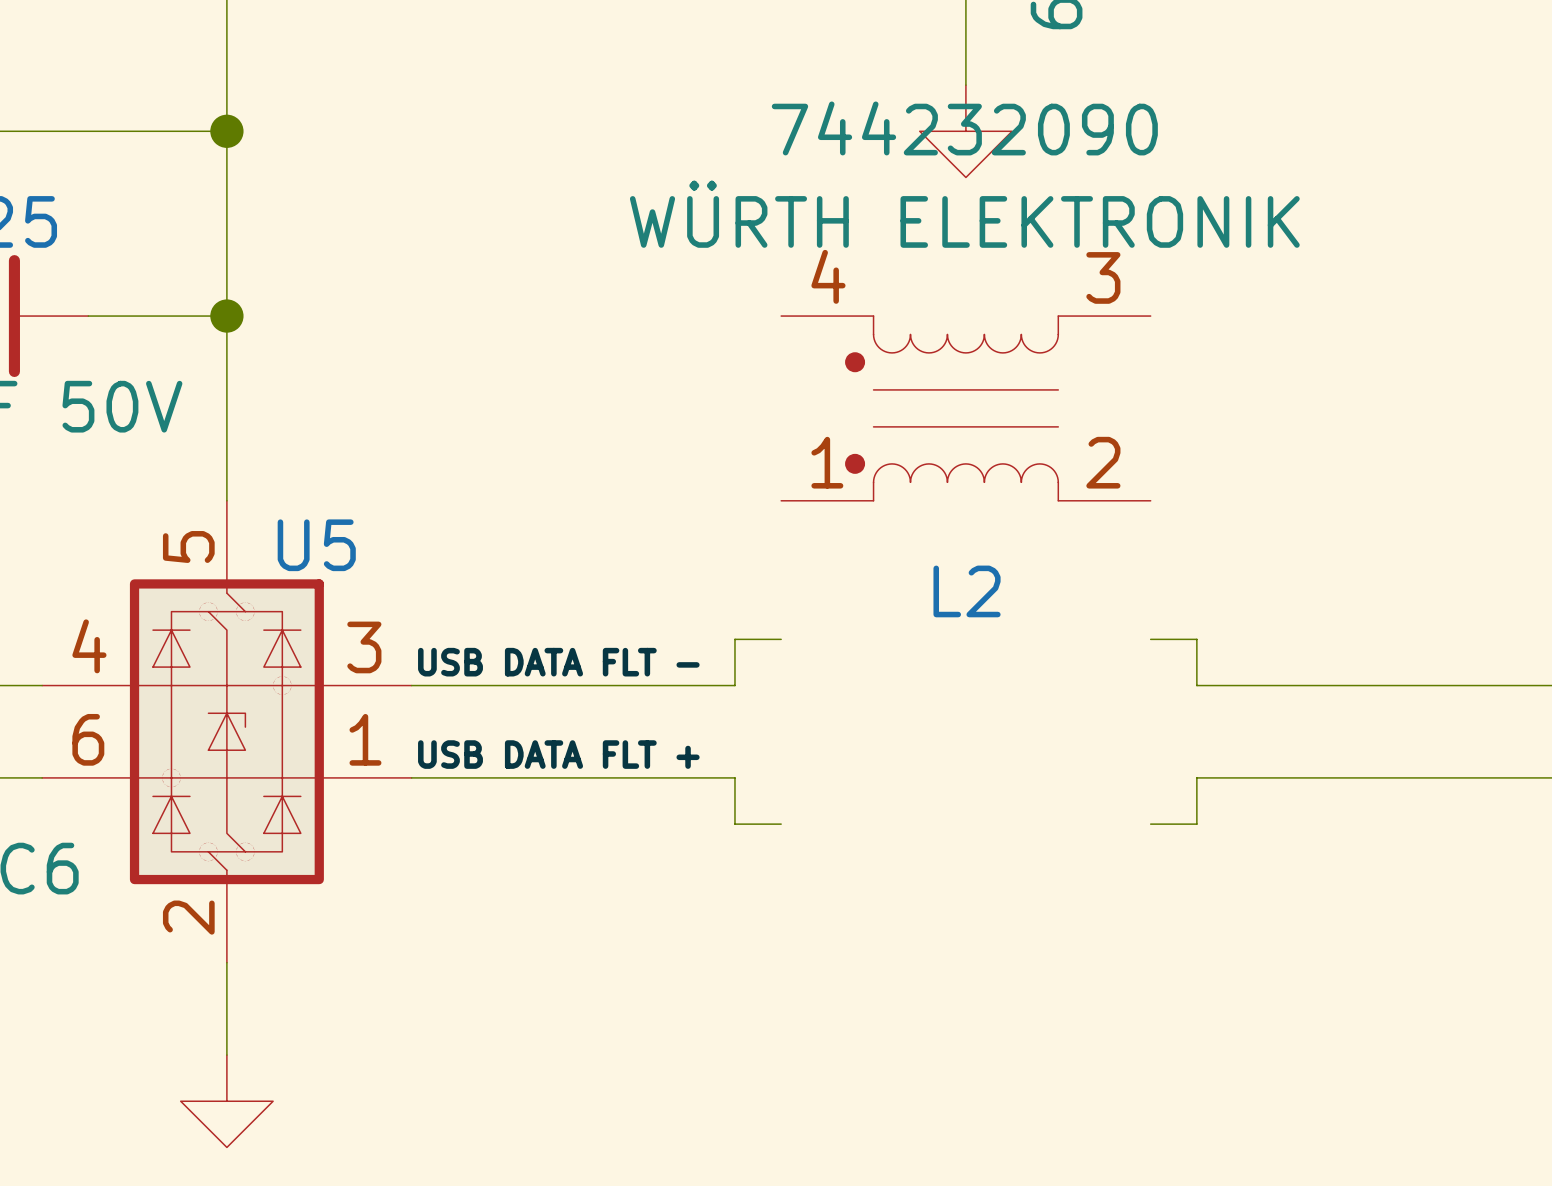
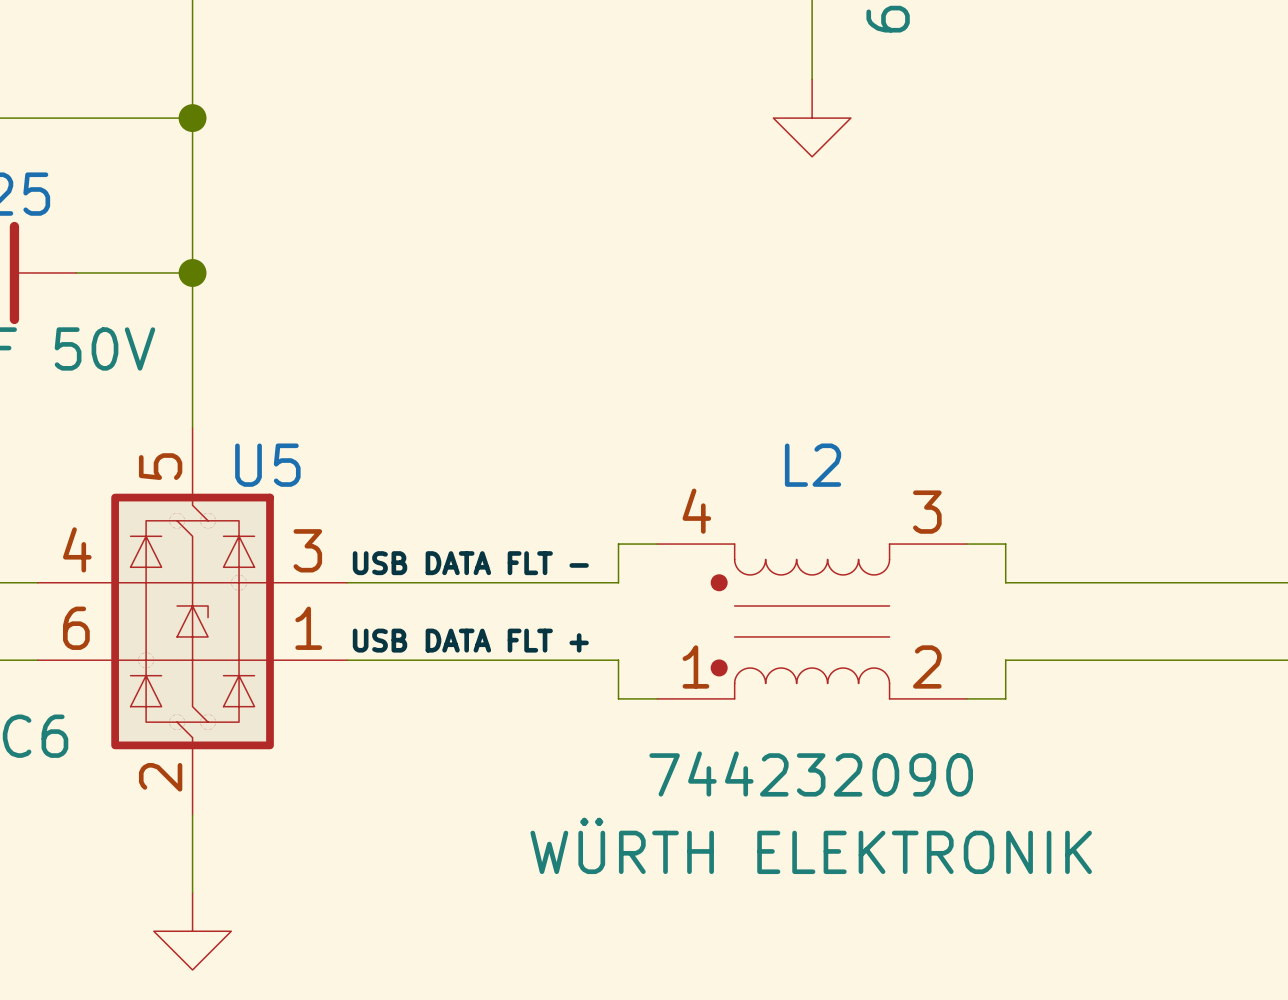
L2 text position: 744232090 (964, 128) -> 744232090 (811, 773)
L2 text position: WÜRTH ELEKTRONIK (964, 214) -> WÜRTH ELEKTRONIK (811, 845)
L2 position: (965, 408) -> (812, 621)
L2 name position: L2 (967, 591) -> L2 (813, 465)

